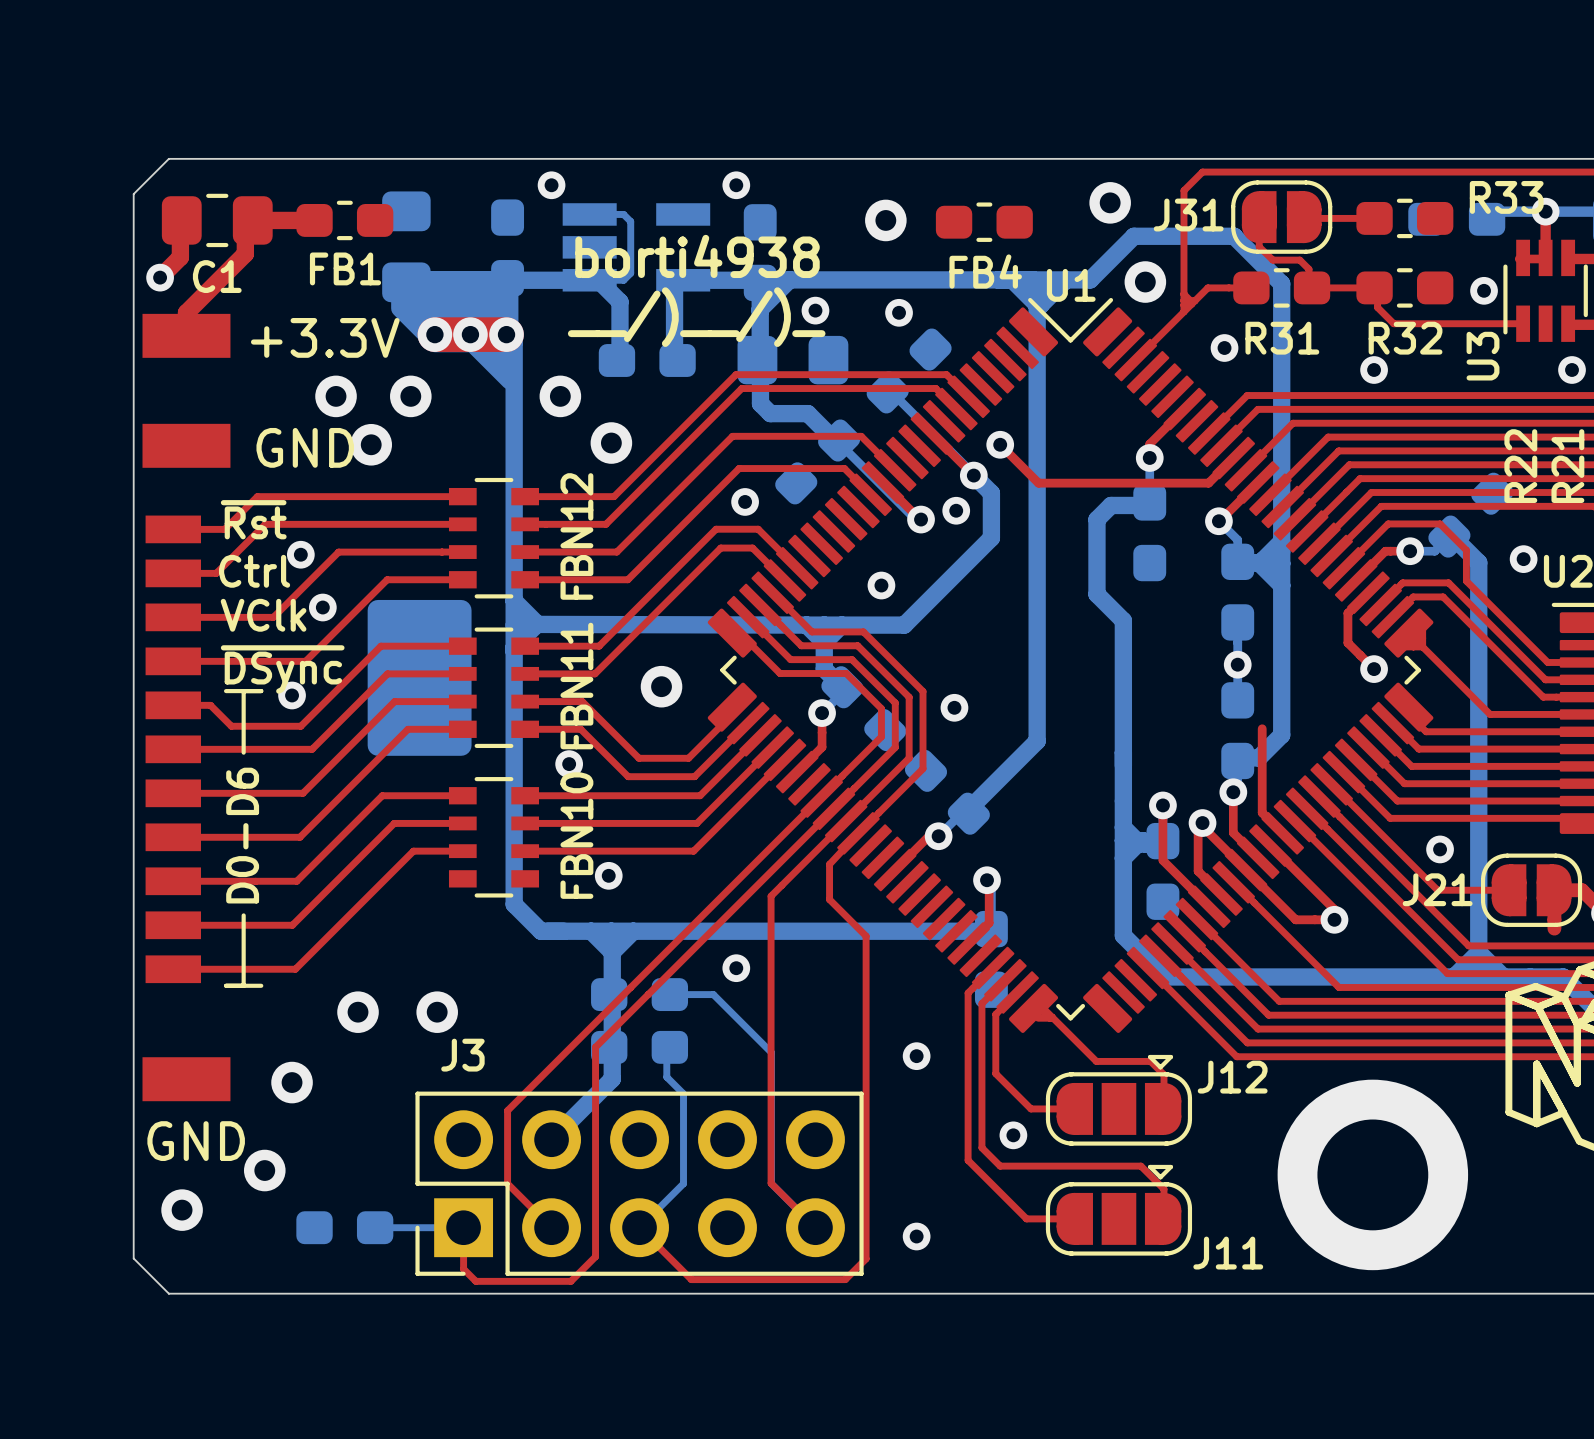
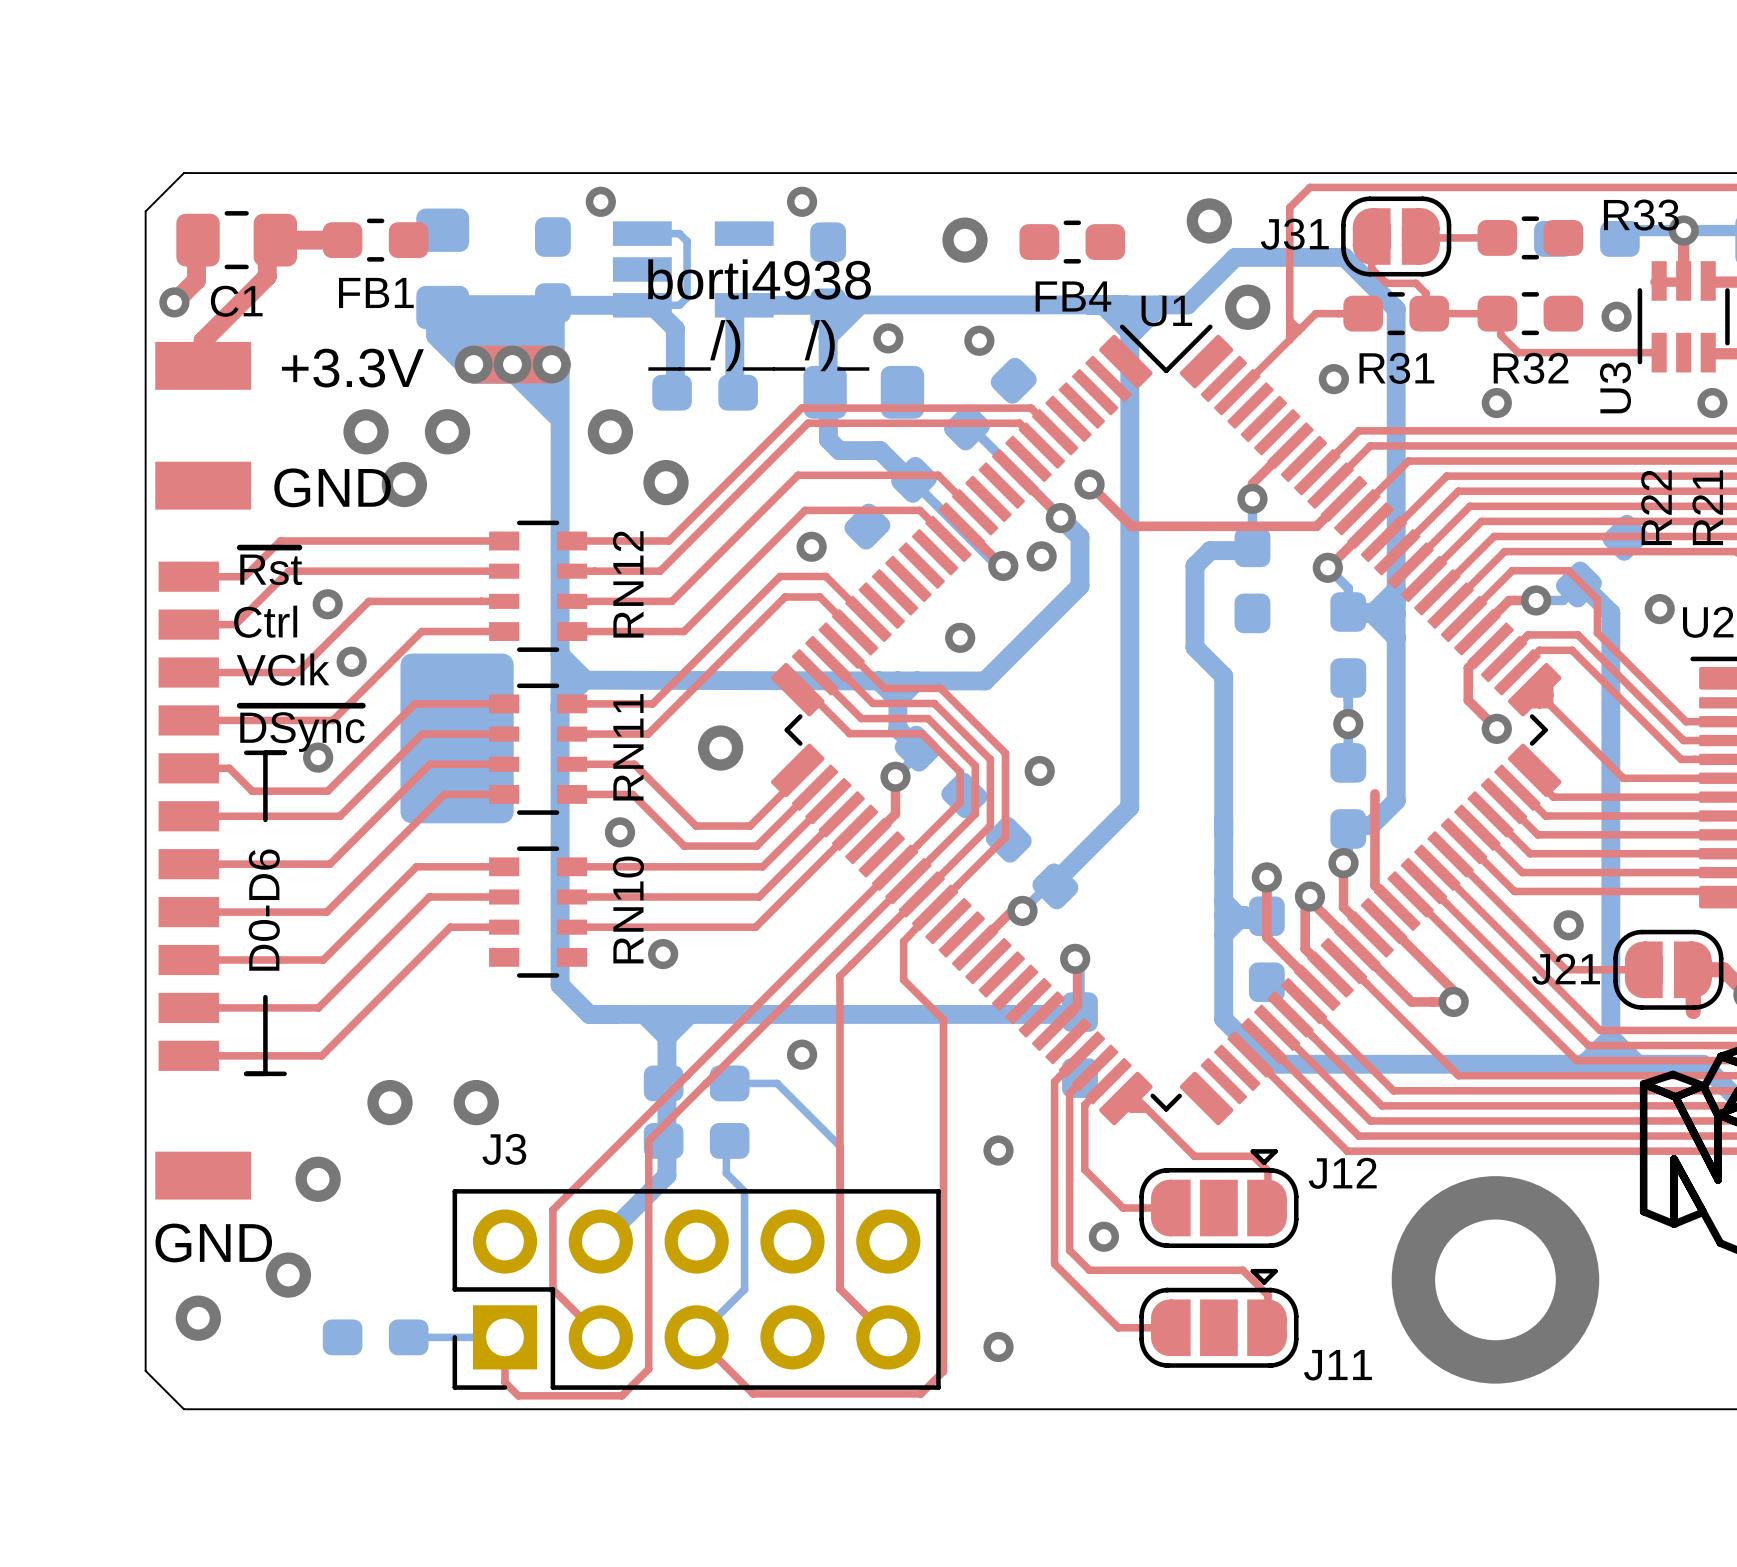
FBN12 name: FBN12 (576, 536) -> RN12 (628, 584)
FBN11 name: FBN11 (576, 686) -> RN11 (628, 747)
FBN10 name: FBN10 (576, 835) -> RN10 (628, 909)

